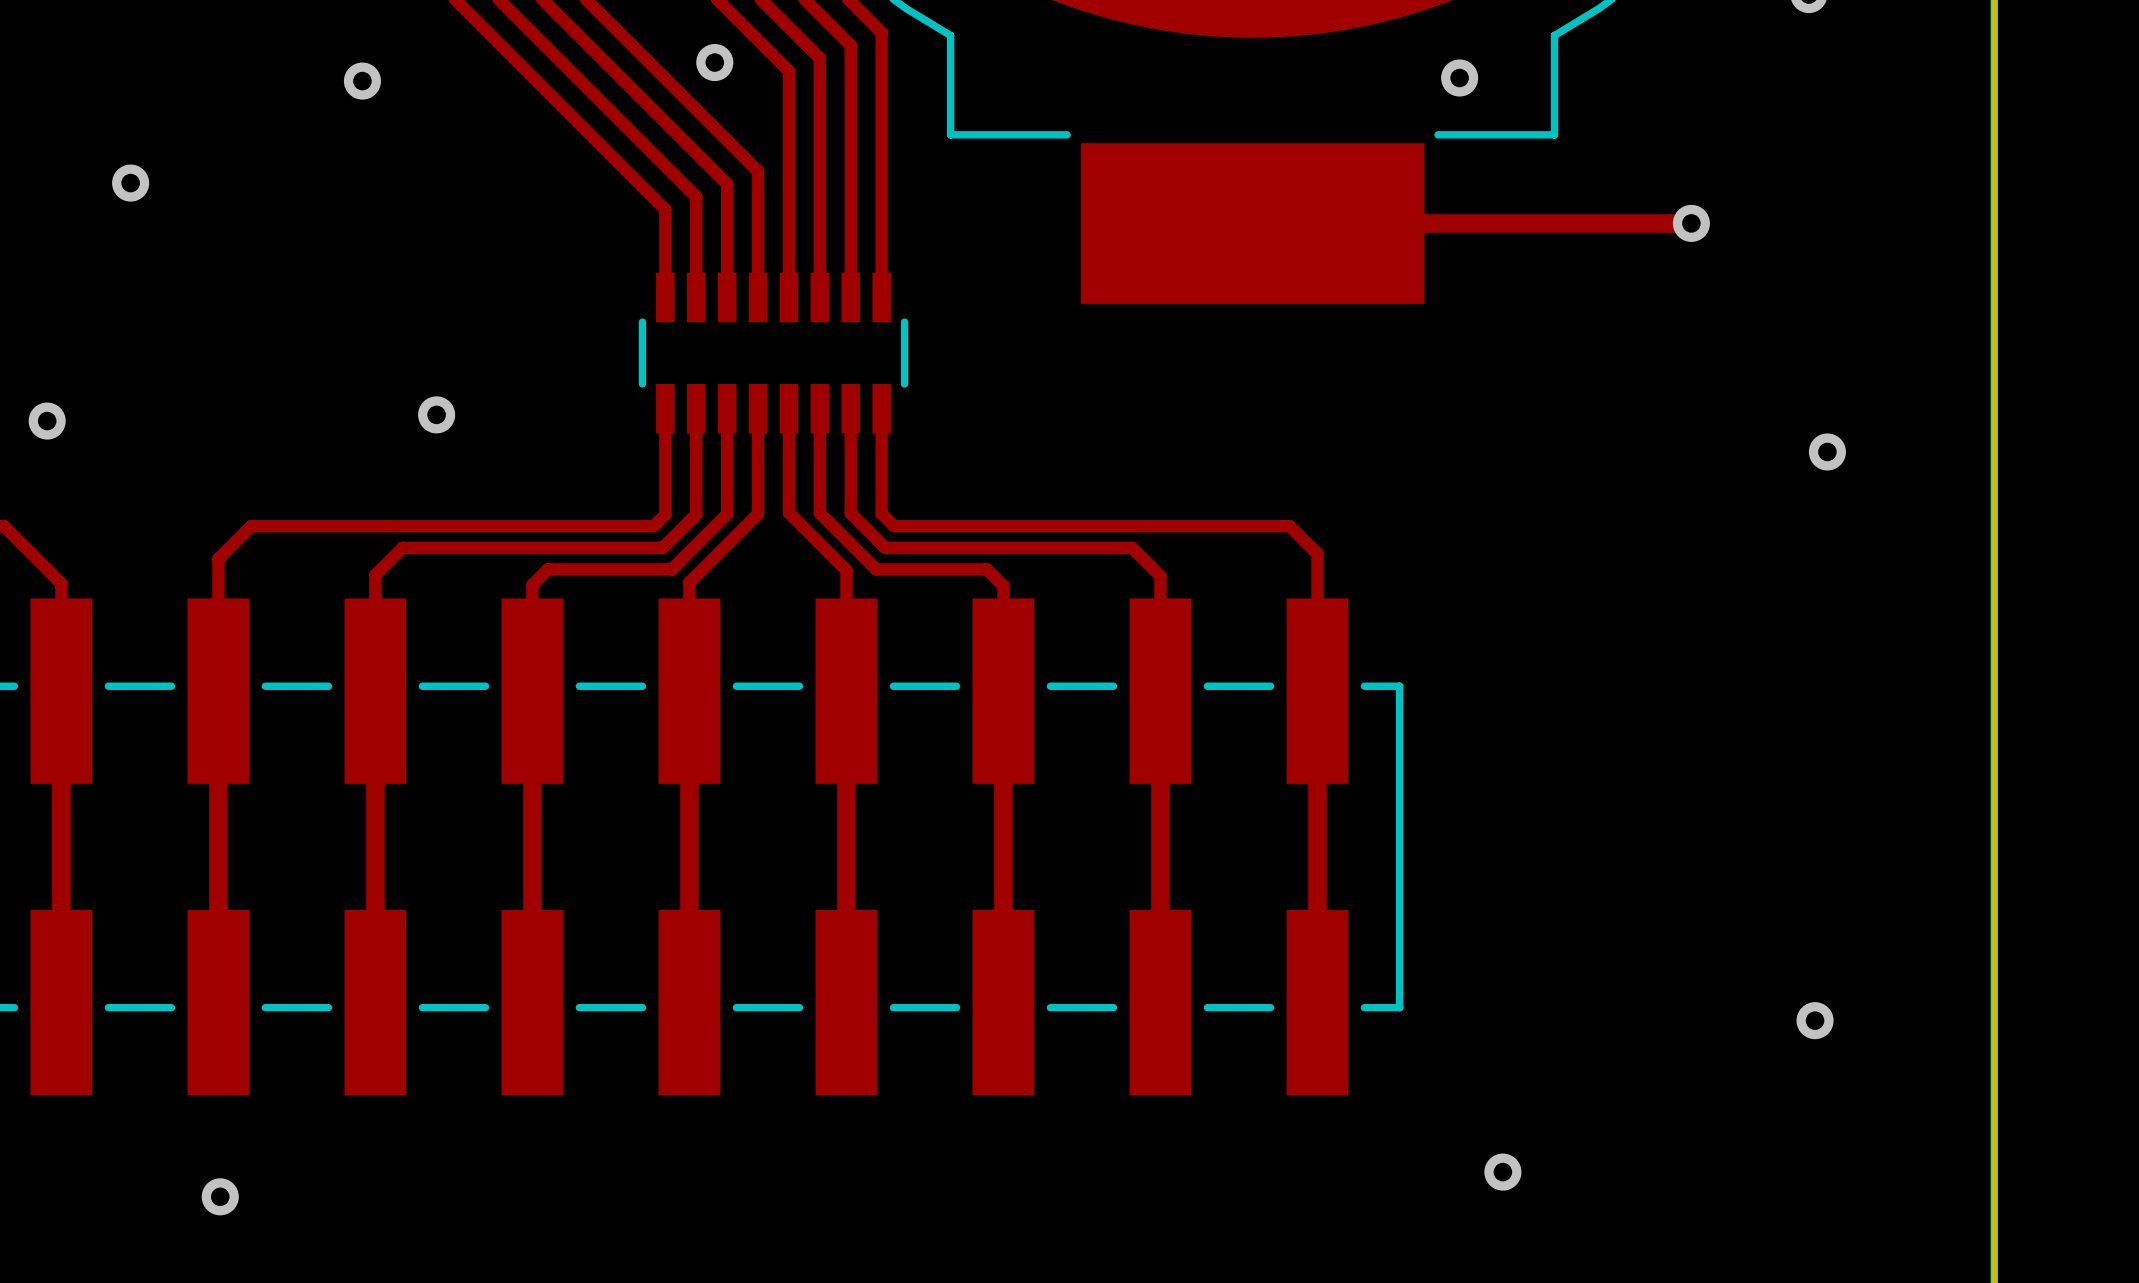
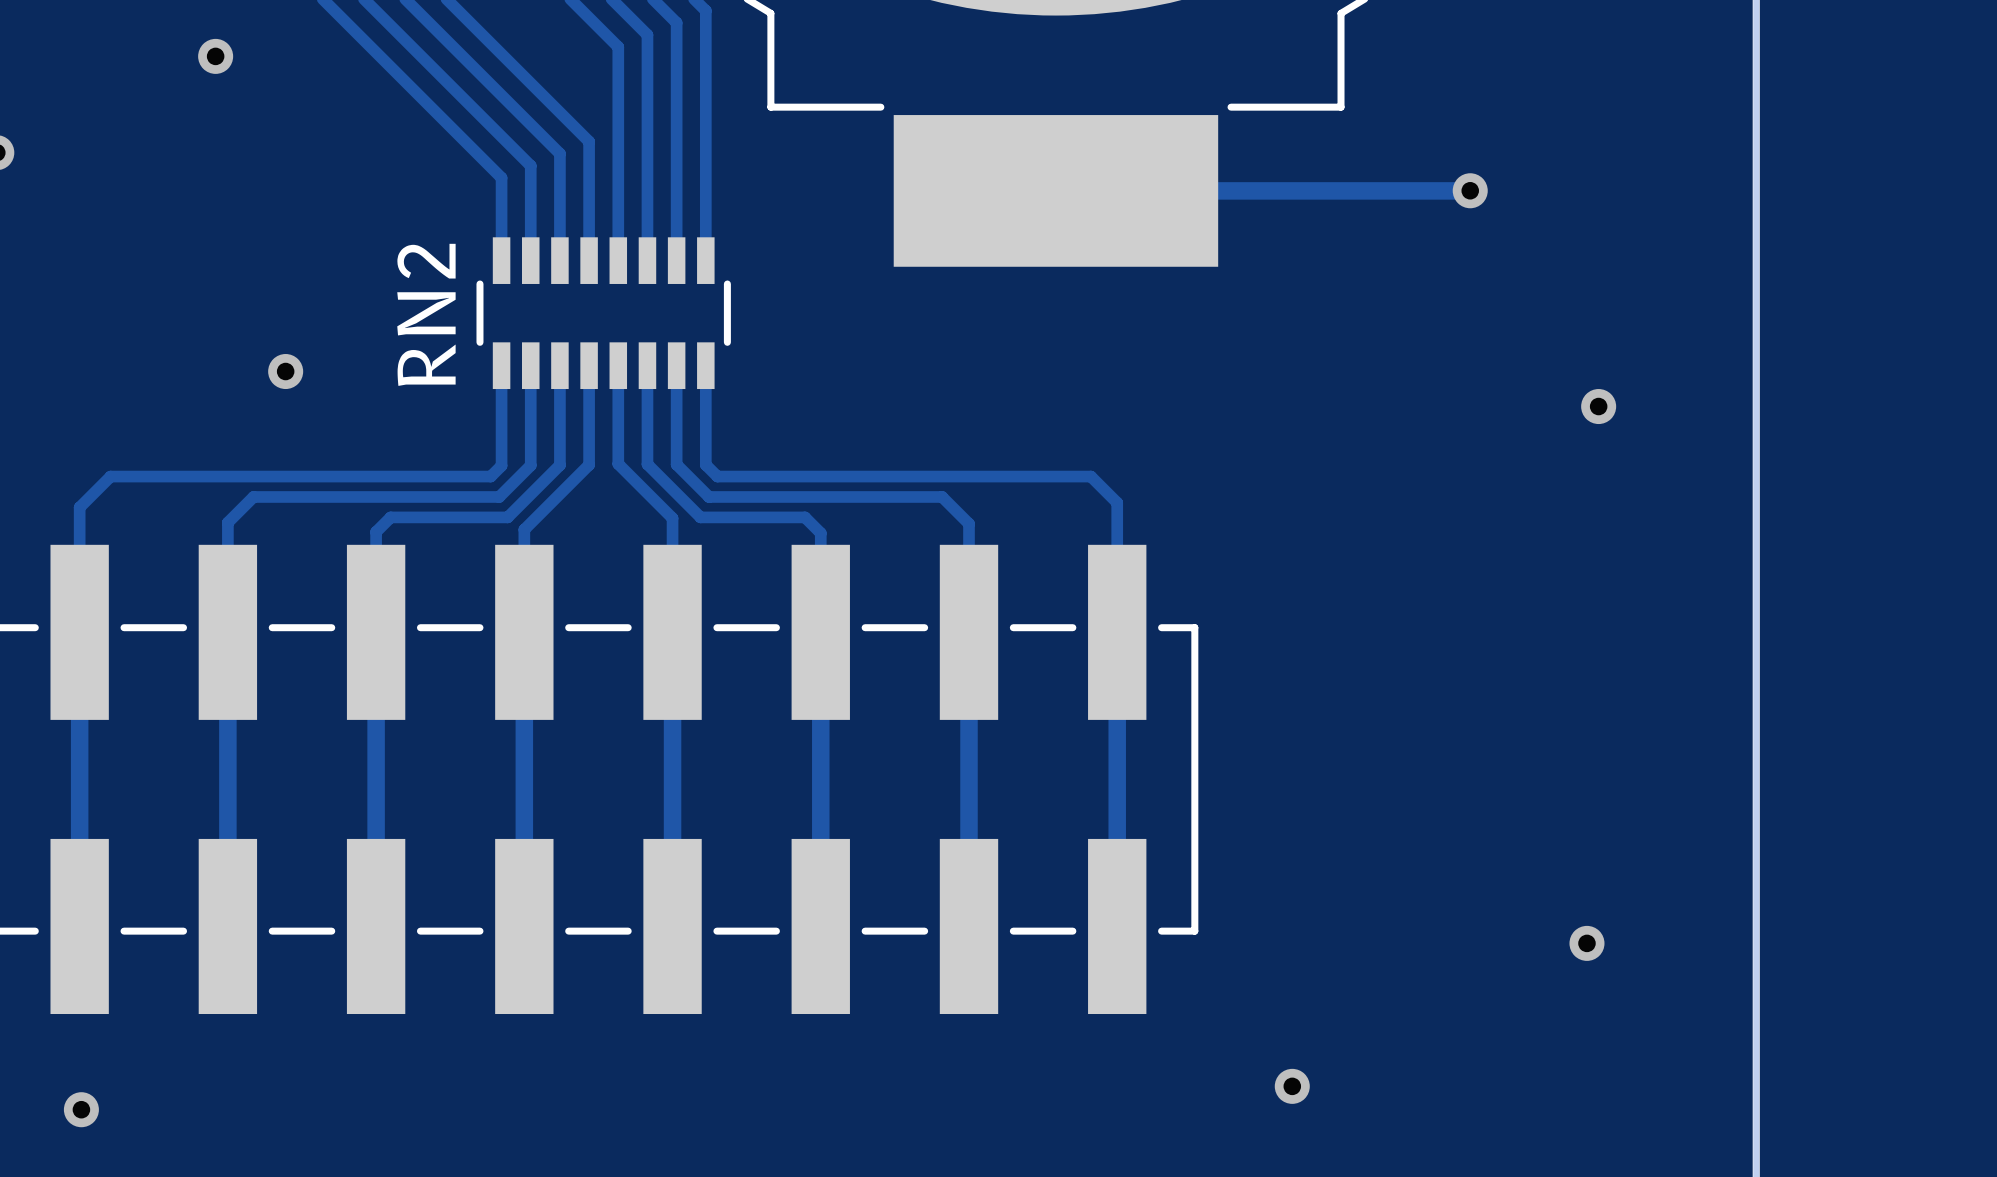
via: (714, 62) -> none
via: (1459, 77) -> none
RN2 name: none -> RN2 (426, 314)

